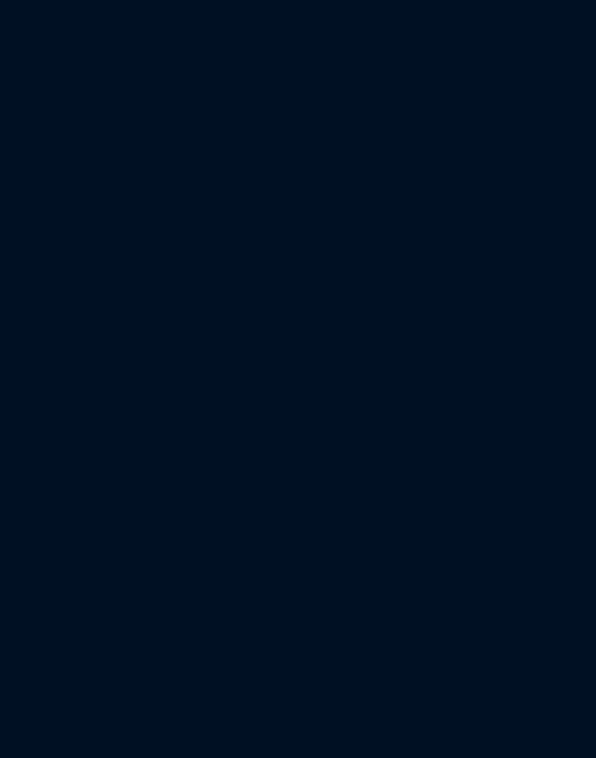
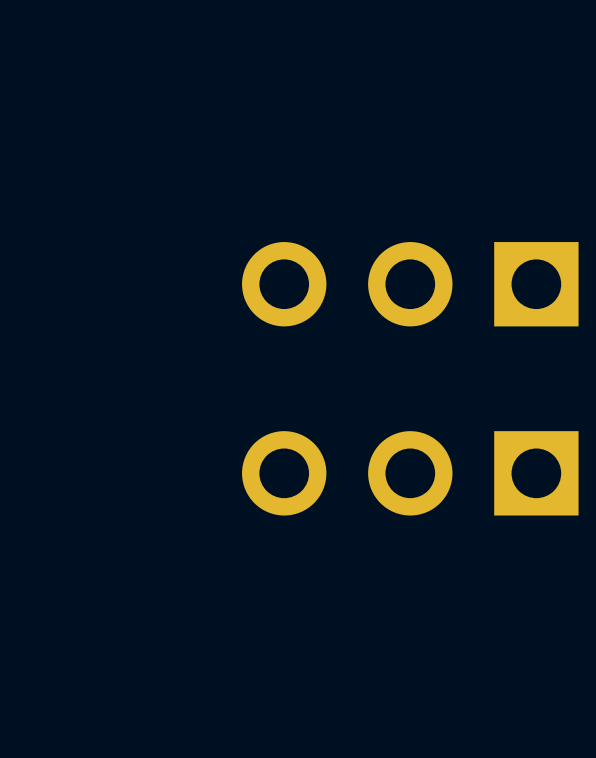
part: none -> (410, 284)
part: none -> (410, 473)

